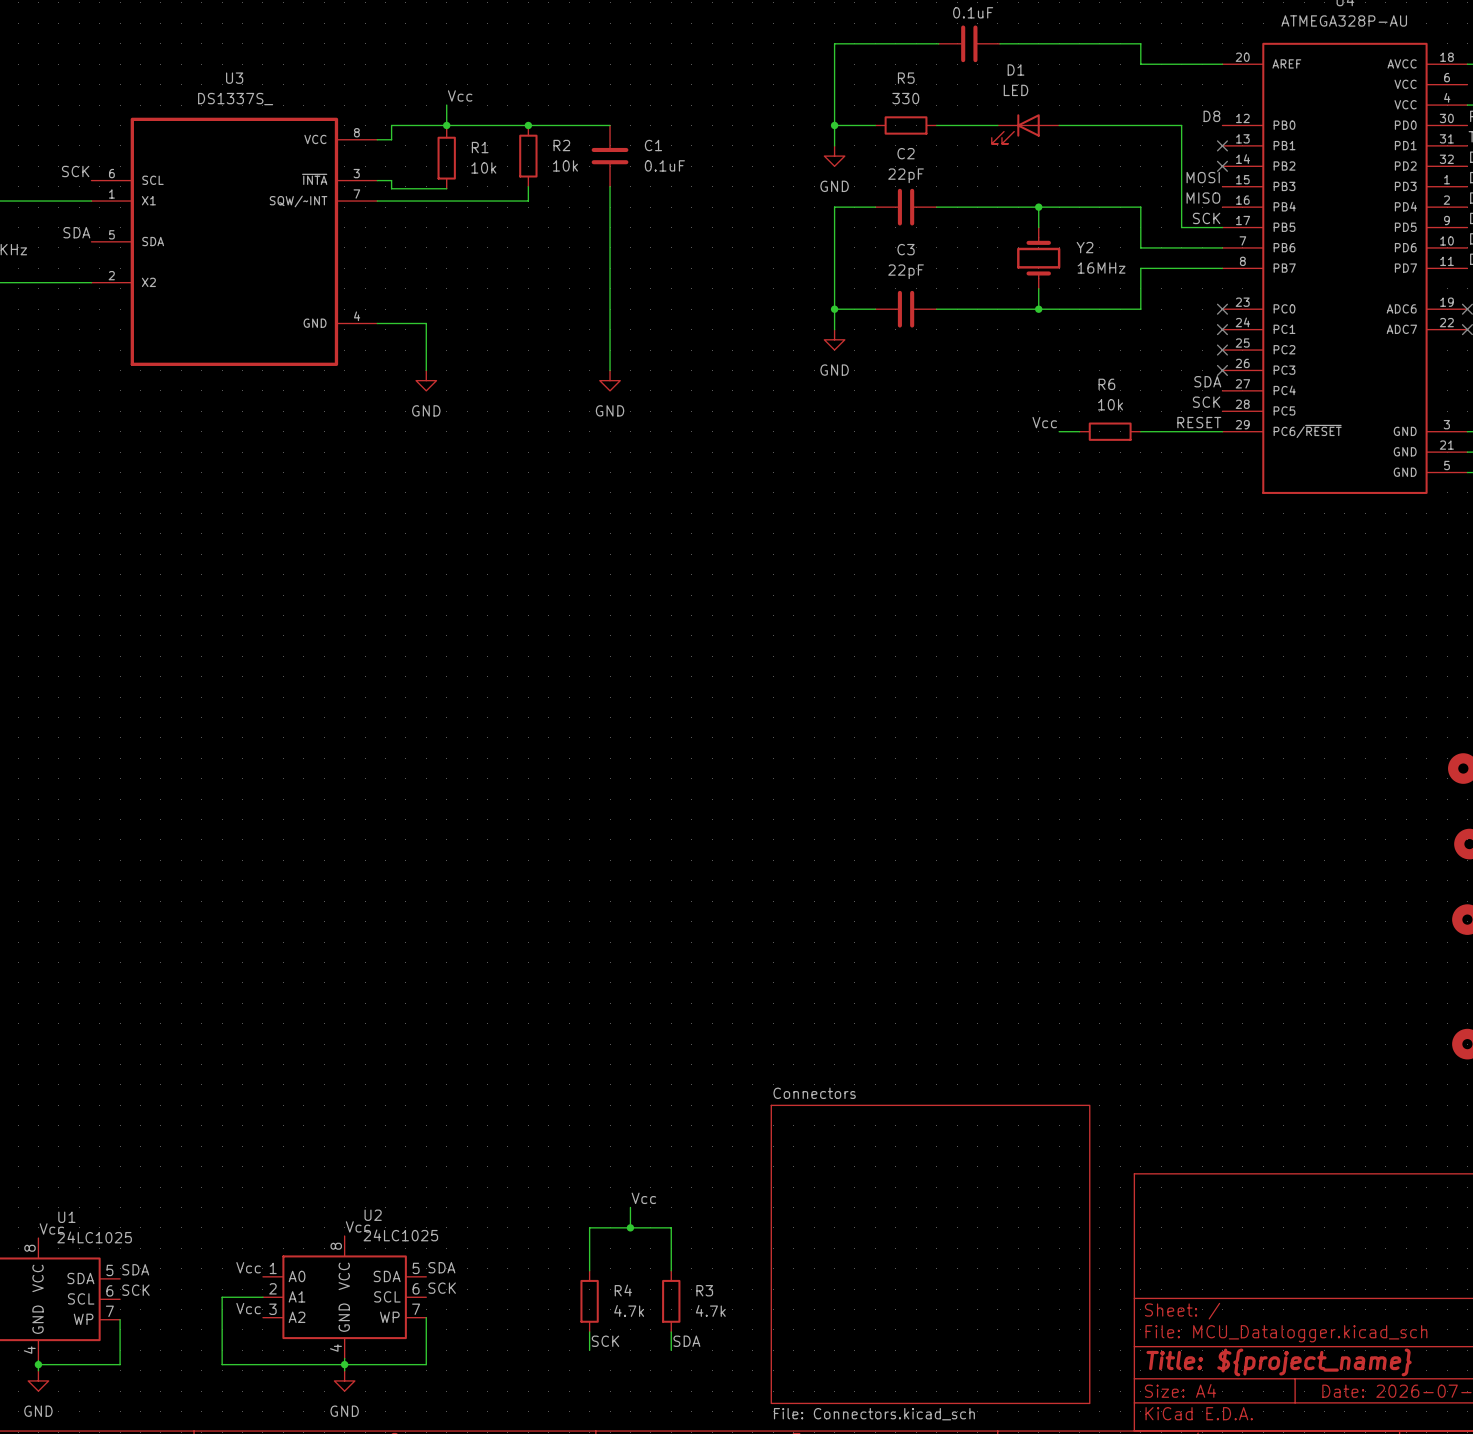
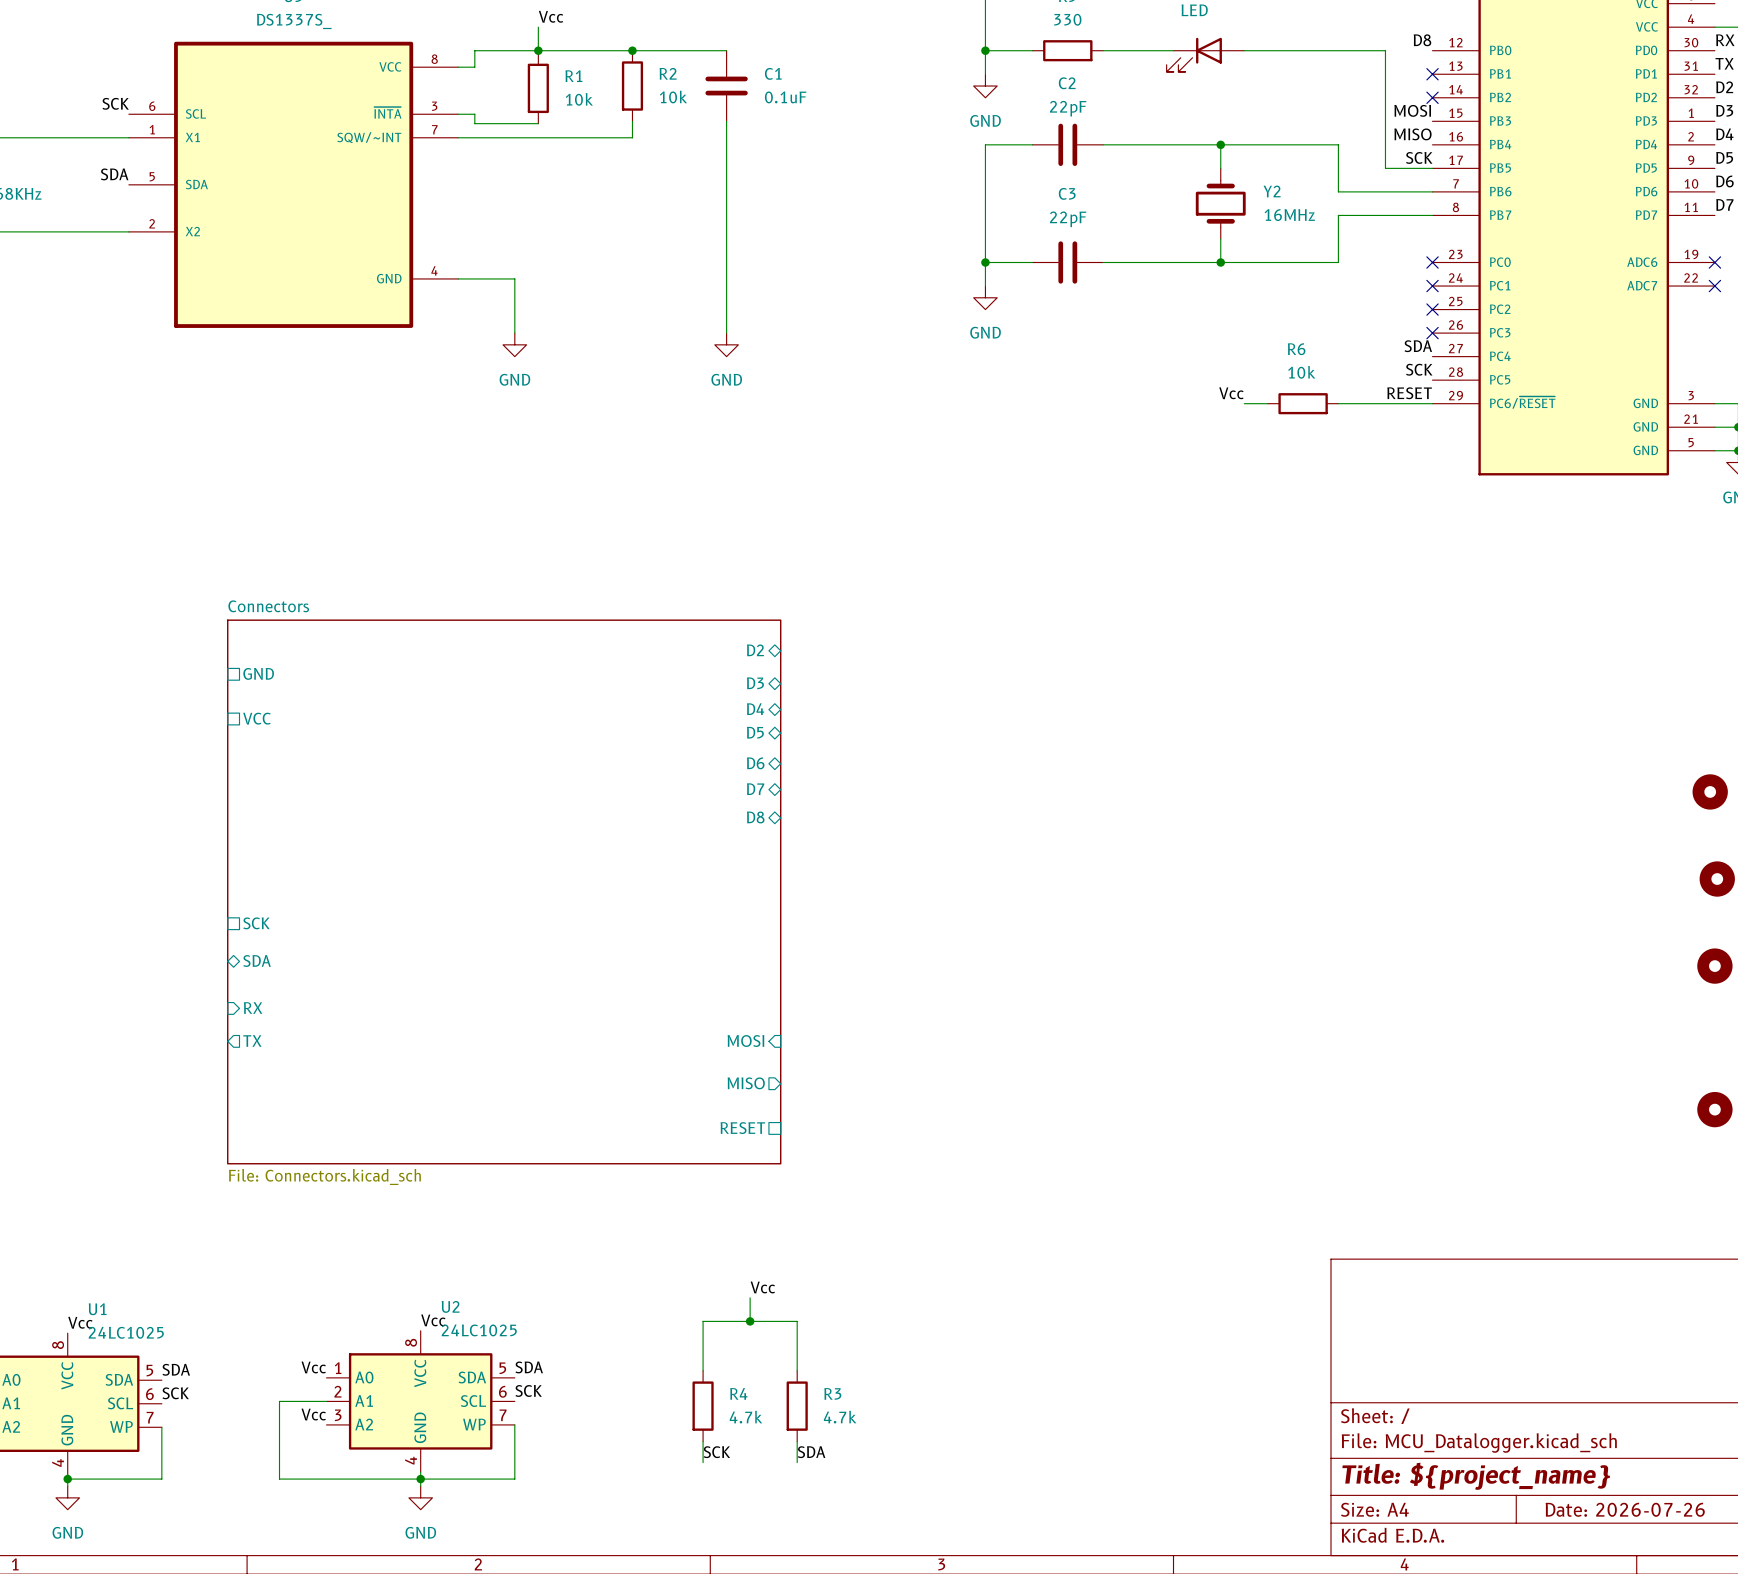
sheet pin: none -> D2 (755, 650)
sheet pin: none -> GND (258, 673)
sheet pin: none -> D3 (755, 683)
sheet pin: none -> D4 (755, 709)
sheet pin: none -> VCC (256, 718)
sheet pin: none -> D5 (755, 732)
sheet pin: none -> D6 (755, 763)
sheet pin: none -> D7 (755, 789)
sheet pin: none -> D8 (755, 817)
sheet Connectors: none -> File: Connectors.kicad_sch (504, 891)
sheet pin: none -> SCK (256, 923)
sheet pin: none -> SDA (257, 961)
sheet pin: none -> RX (253, 1008)
sheet pin: none -> TX (252, 1040)
sheet pin: none -> MOSI (745, 1041)
sheet pin: none -> MISO (746, 1083)
sheet pin: none -> RESET (742, 1128)
sheet Connectors: File: Connectors.kicad_sch (930, 1254) -> none

